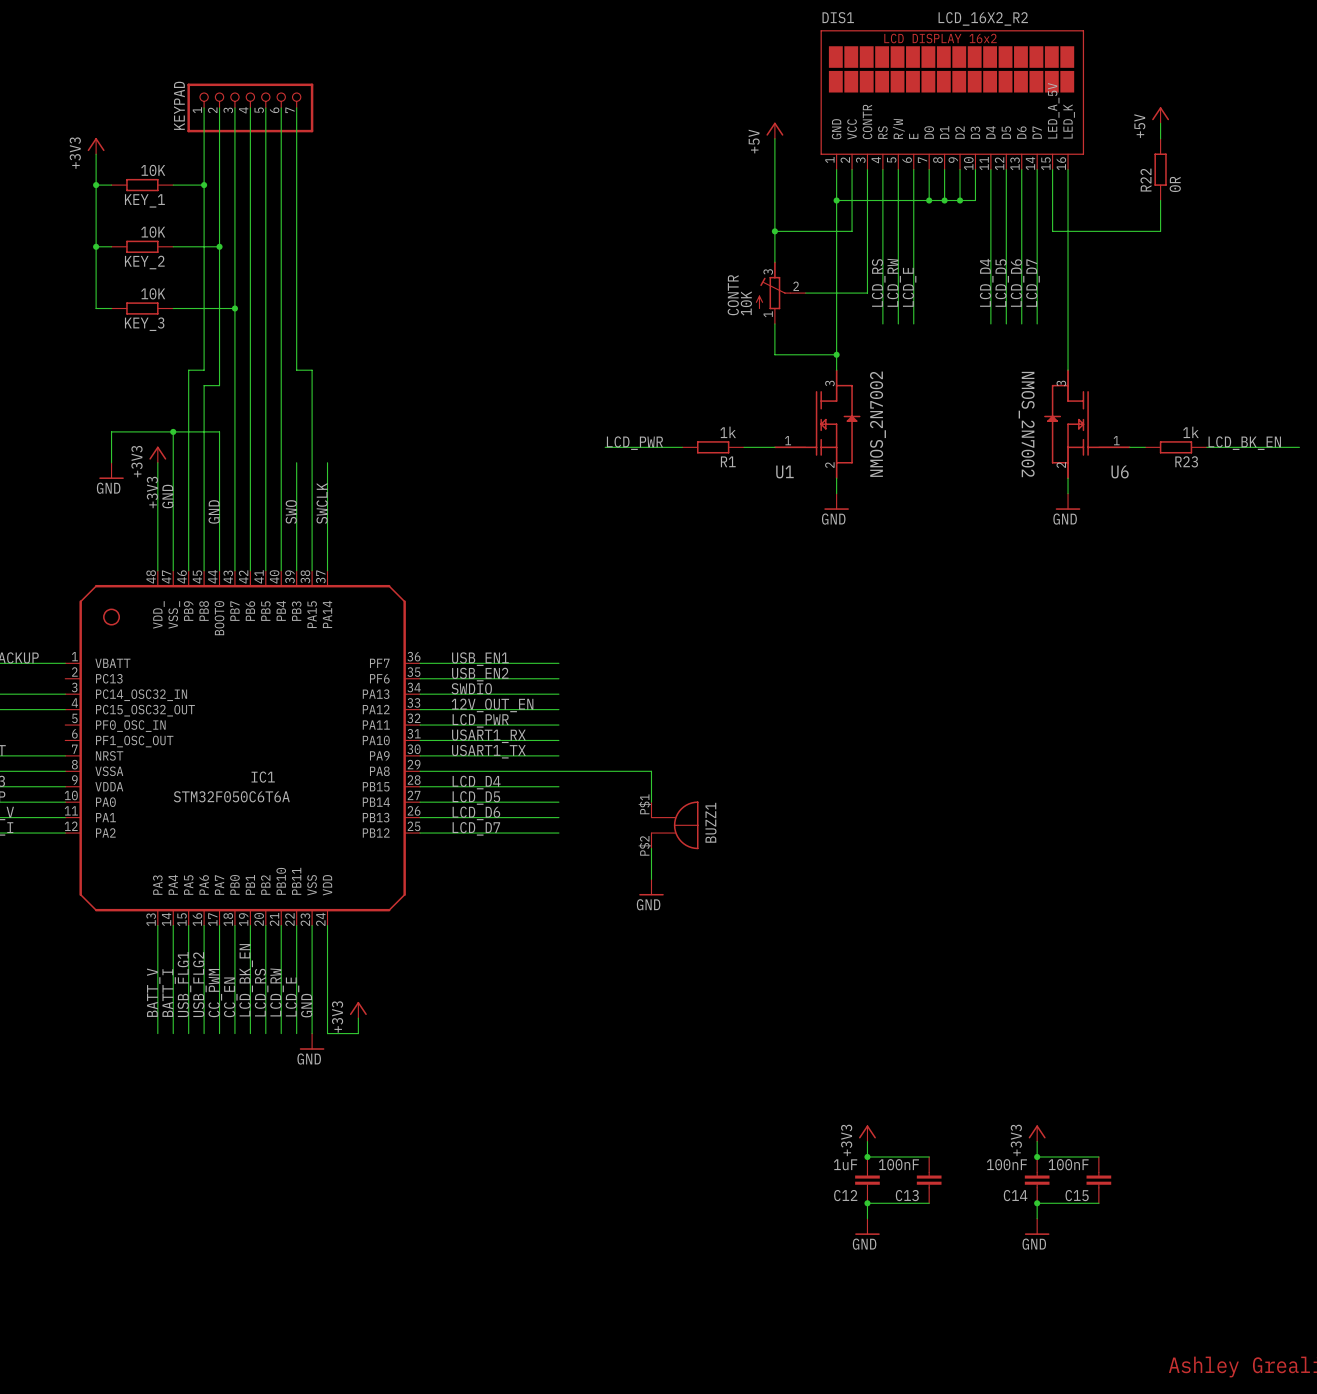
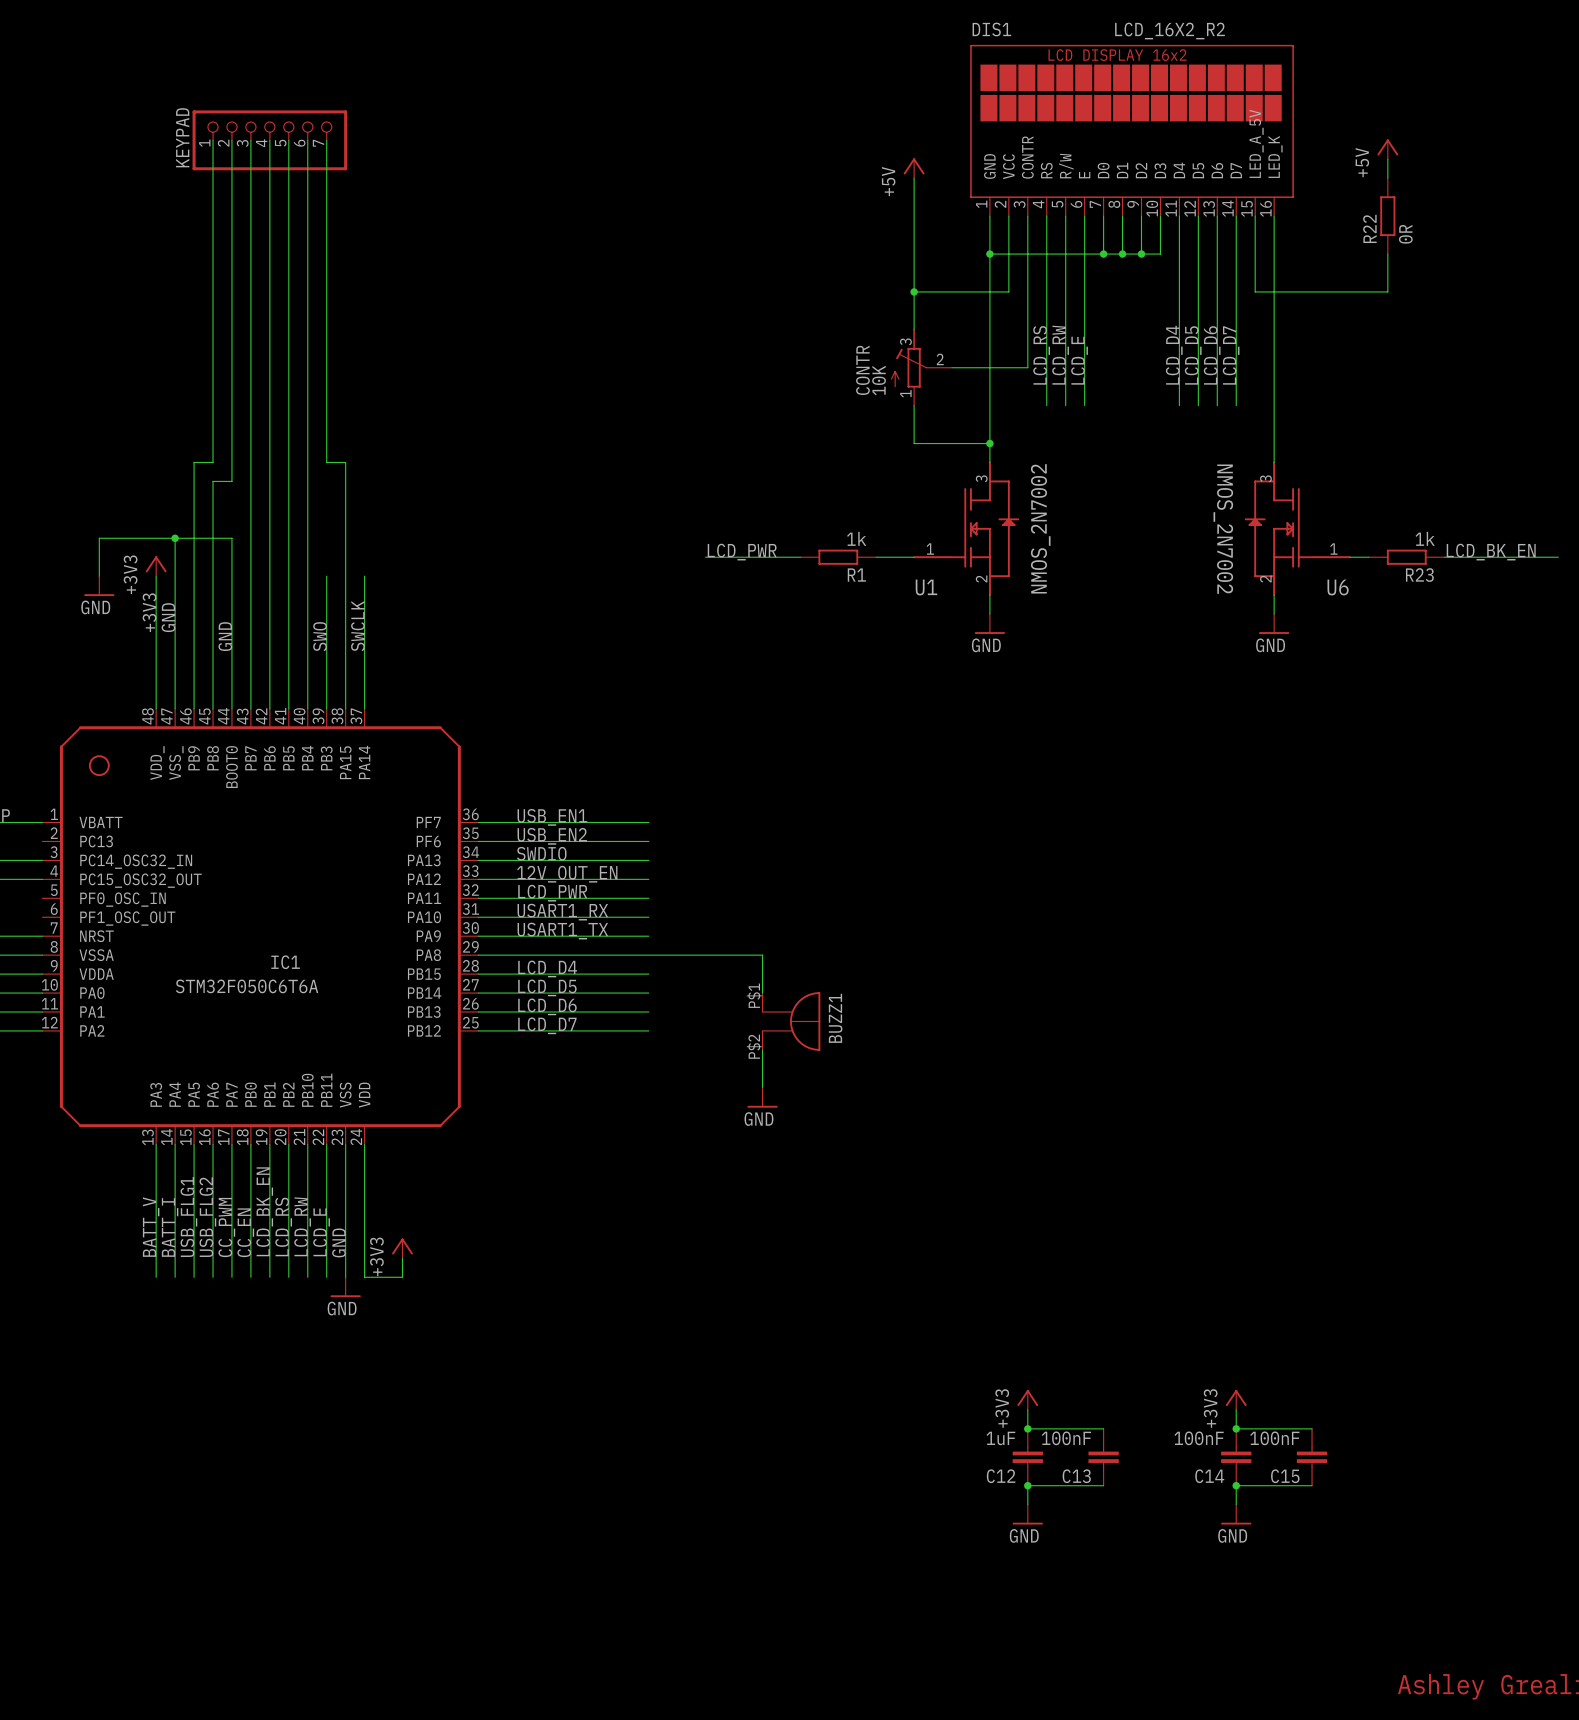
power symbol: +3V3 (96, 146) -> none
wire: (96, 154) (96, 308) (111, 308) -> none
wire: (96, 185) (111, 185) -> none
junction: (96, 185) -> none
KEY_1: 10K (142, 185) -> none
wire: (173, 185) (204, 185) -> none
junction: (204, 185) -> none
wire: (96, 246) (111, 246) -> none
junction: (96, 246) -> none
KEY_2: 10K (142, 246) -> none
wire: (173, 246) (219, 246) -> none
junction: (219, 246) -> none
KEY_3: 10K (142, 308) -> none
wire: (173, 308) (234, 308) -> none
junction: (234, 308) -> none

